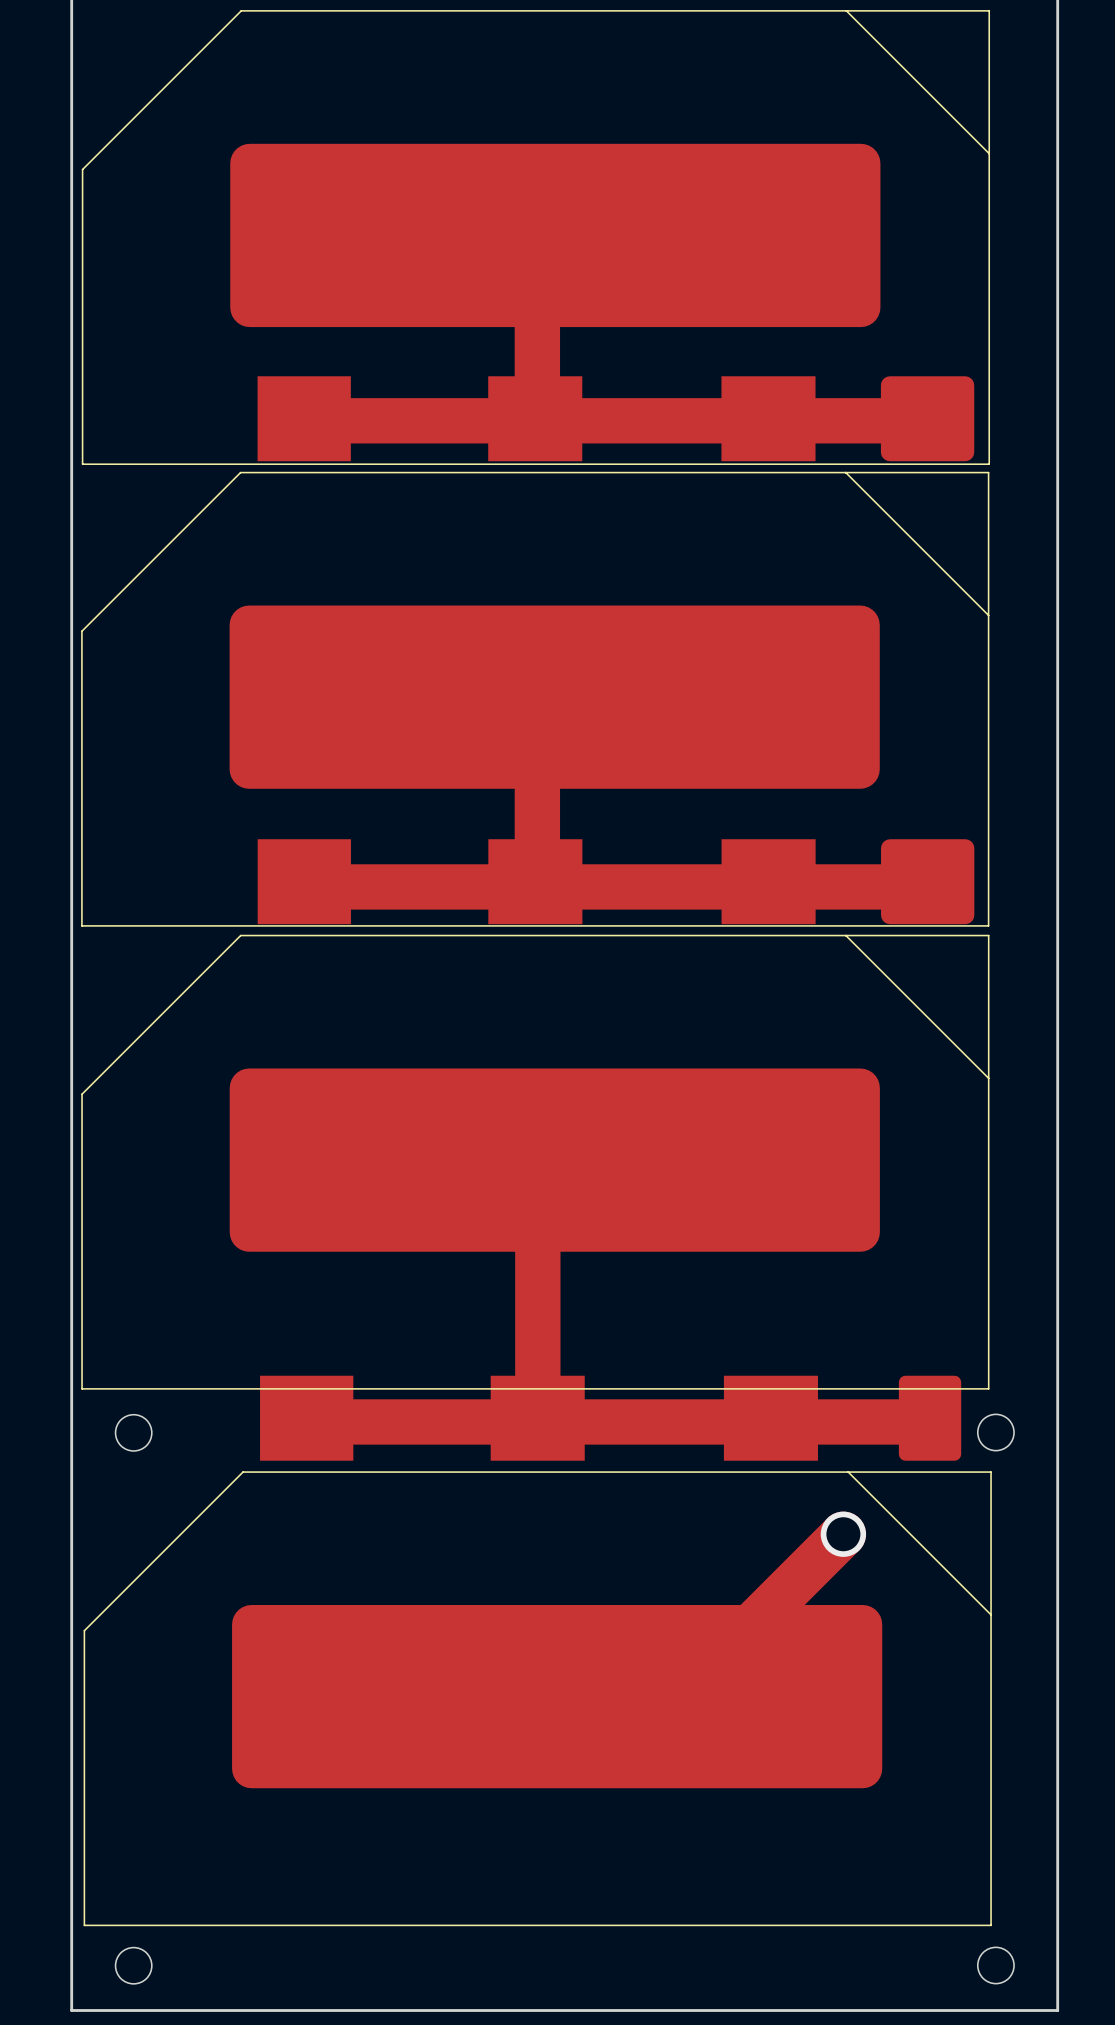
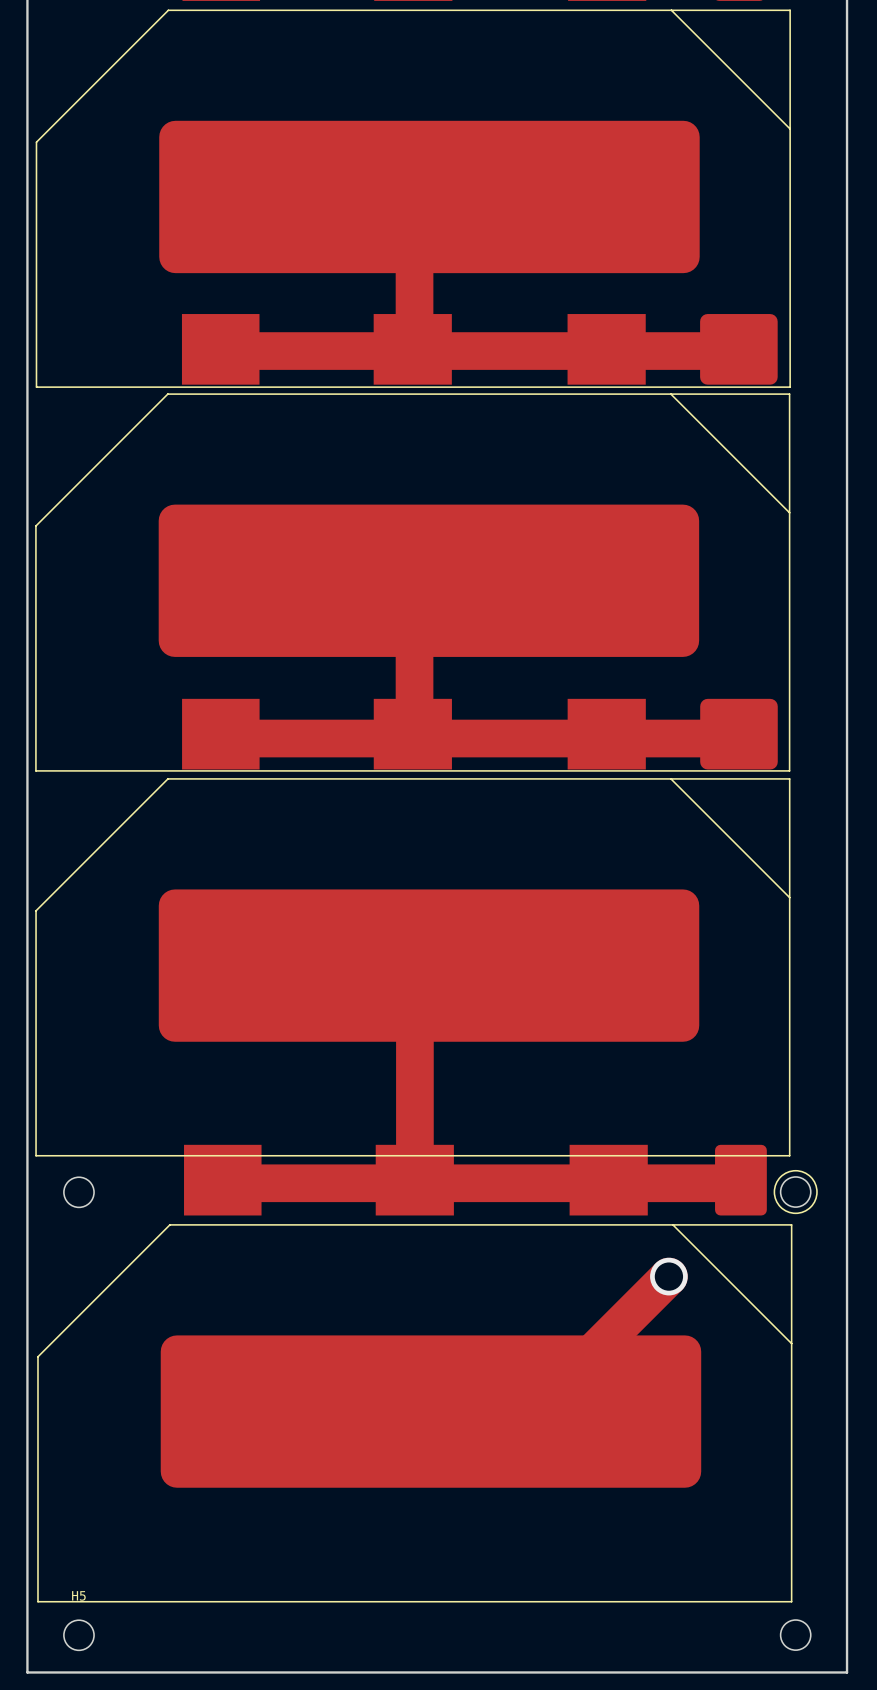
drawing: none -> [773, 1170, 818, 1214]
H5 name: none -> H5 (78, 1595)

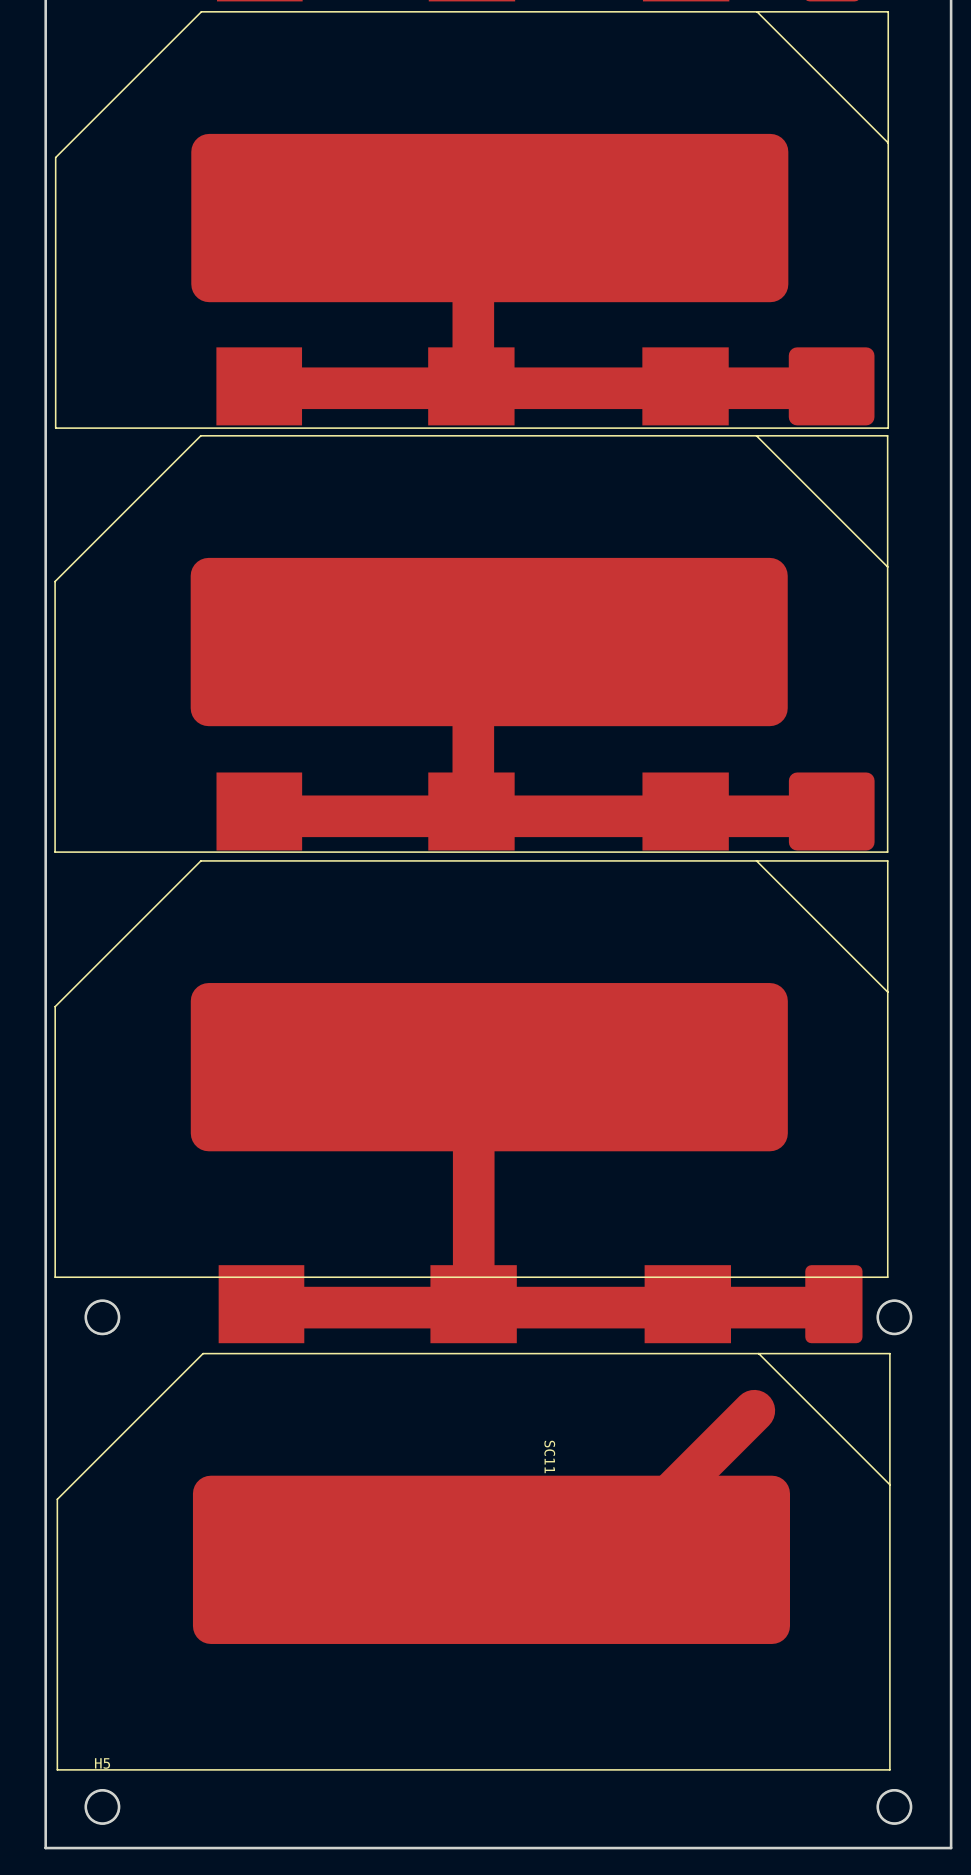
drawing: [773, 1170, 818, 1214] -> none
round board edge: none -> [84, 1299, 121, 1336]
round board edge: none -> [876, 1299, 913, 1336]
via: (668, 1276) -> none
SC11 name: none -> SC11 (549, 1456)
round board edge: none -> [84, 1789, 121, 1825]
round board edge: none -> [876, 1789, 913, 1825]

